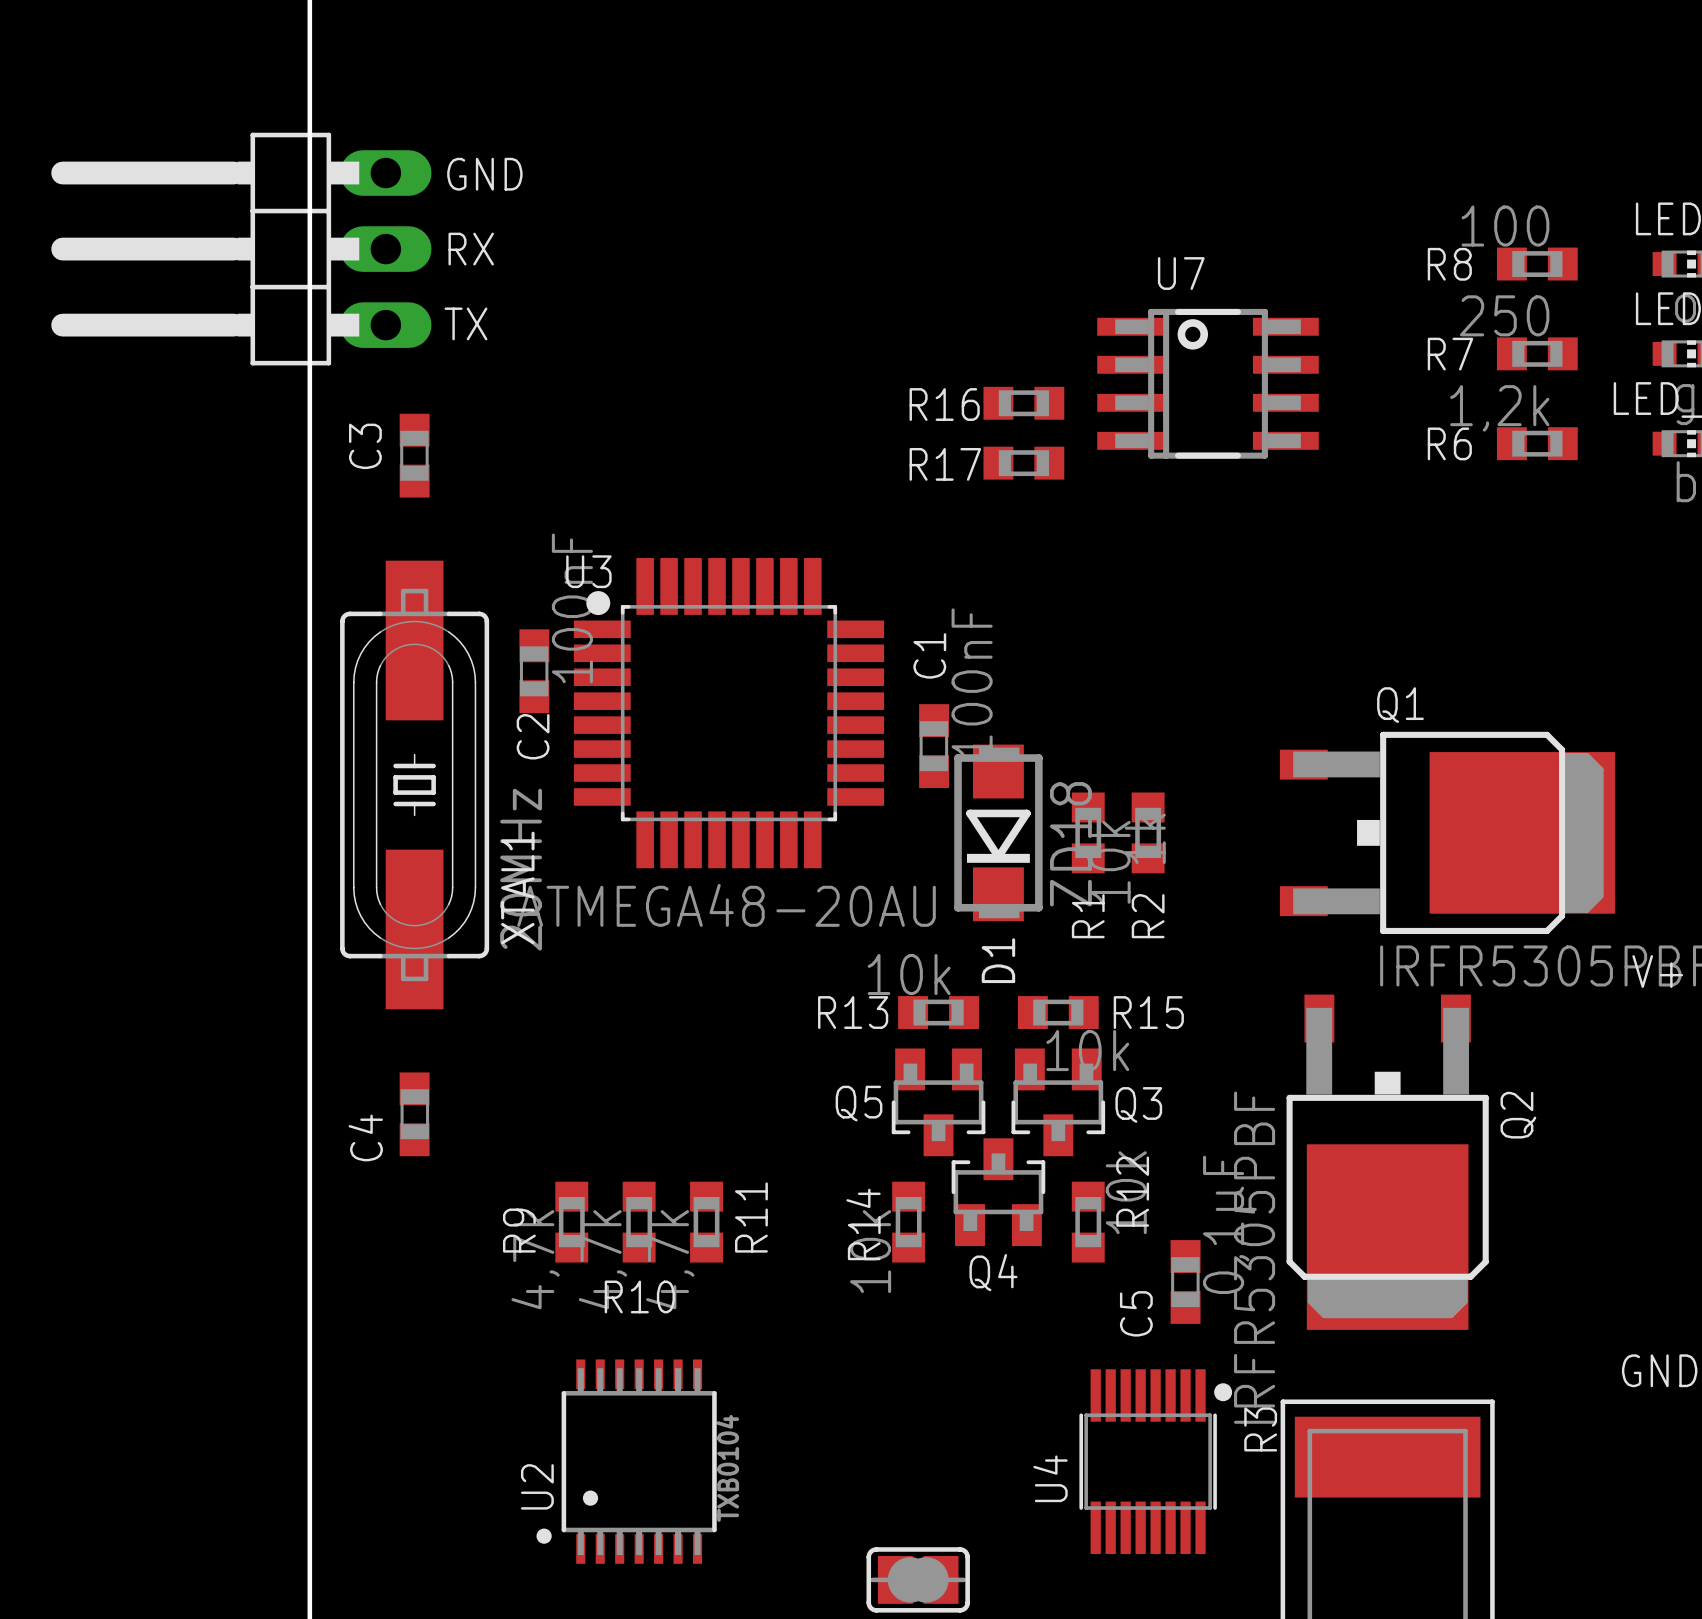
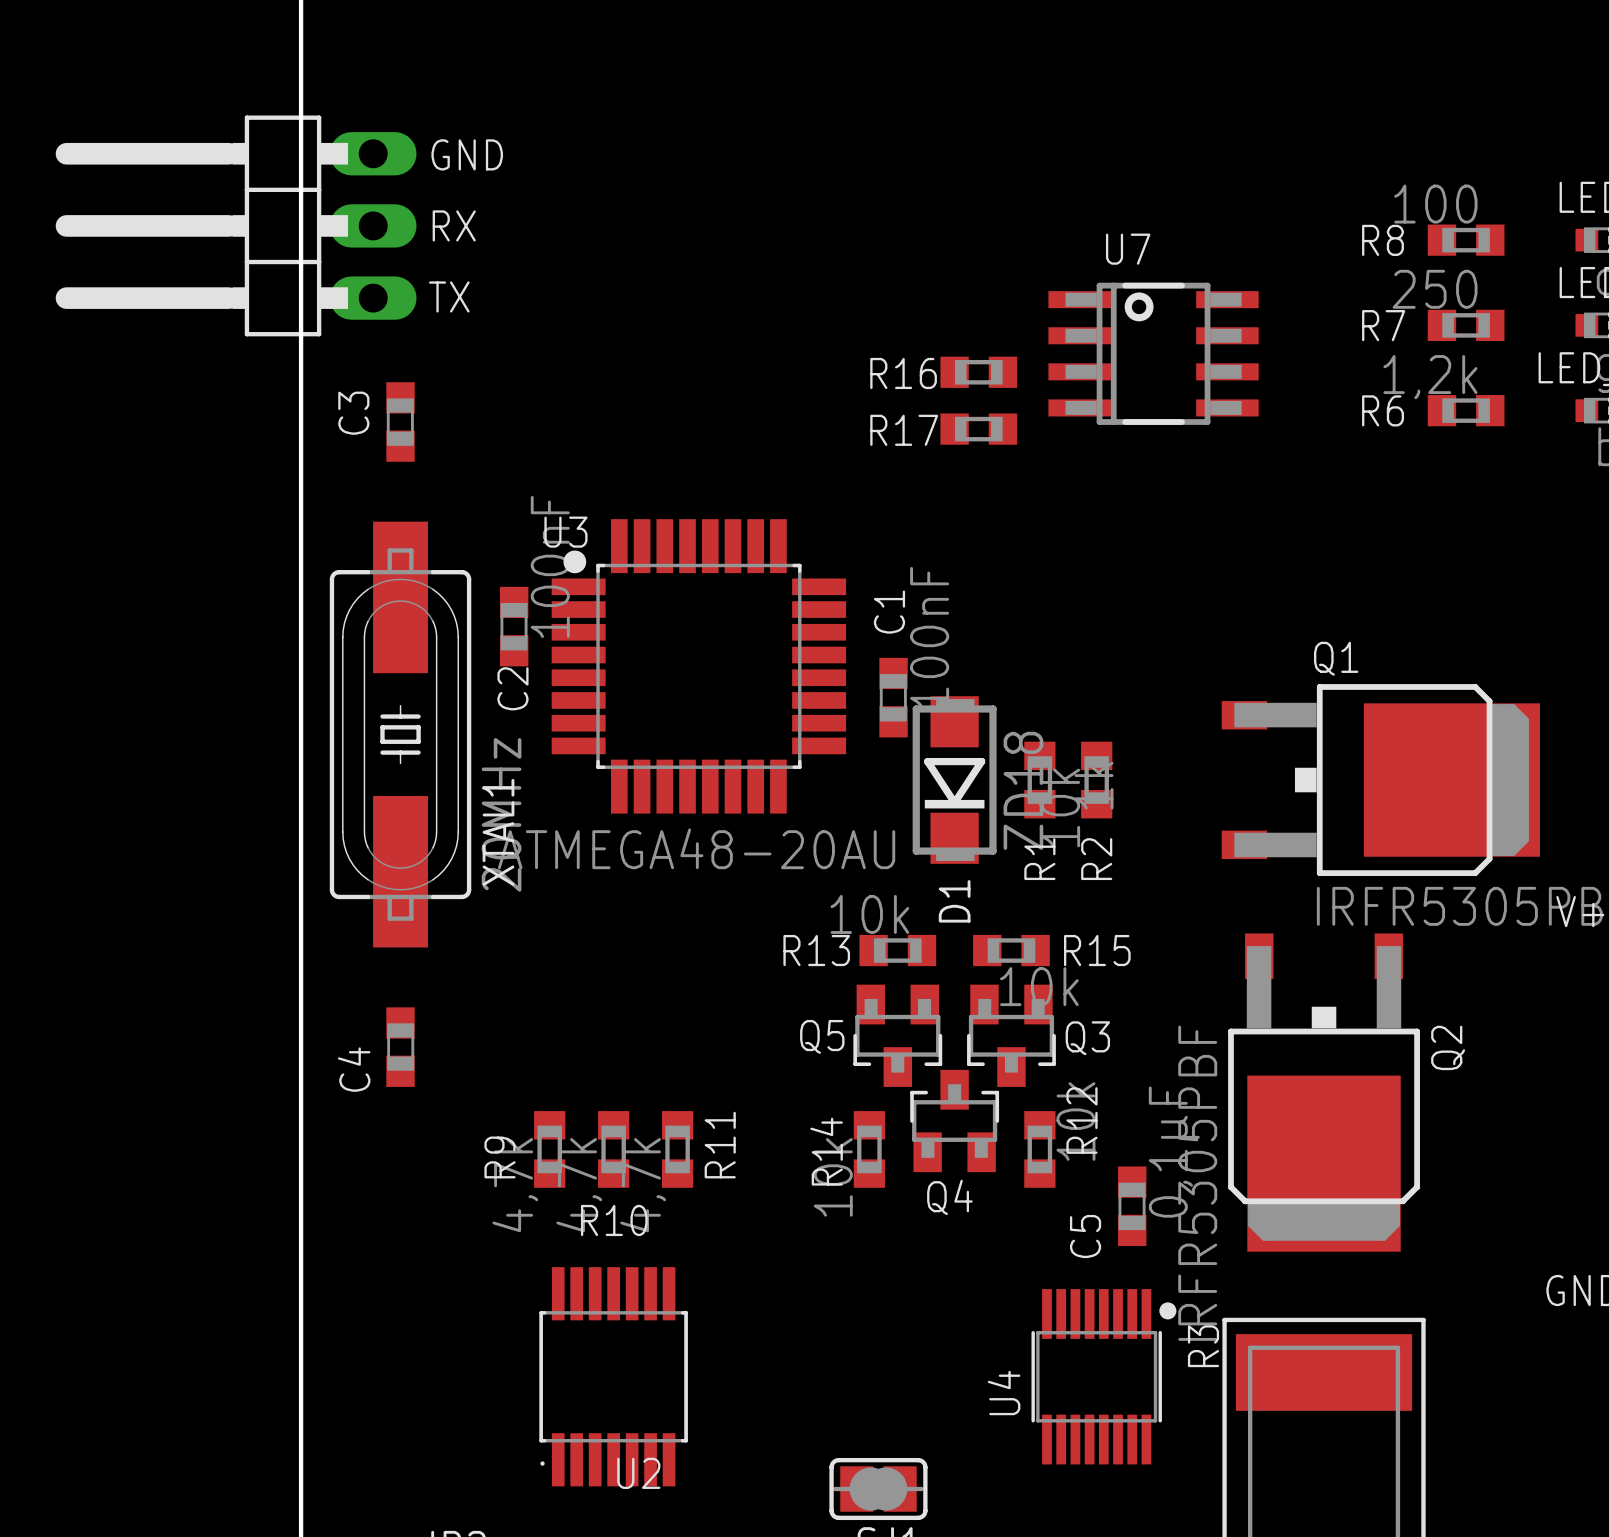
U2 footprint: [536, 1359, 717, 1564] -> [539, 1267, 688, 1487]
U2 value: TXB0104 (727, 1468) -> none
U2 name position: U2 (537, 1486) -> U2 (638, 1473)

